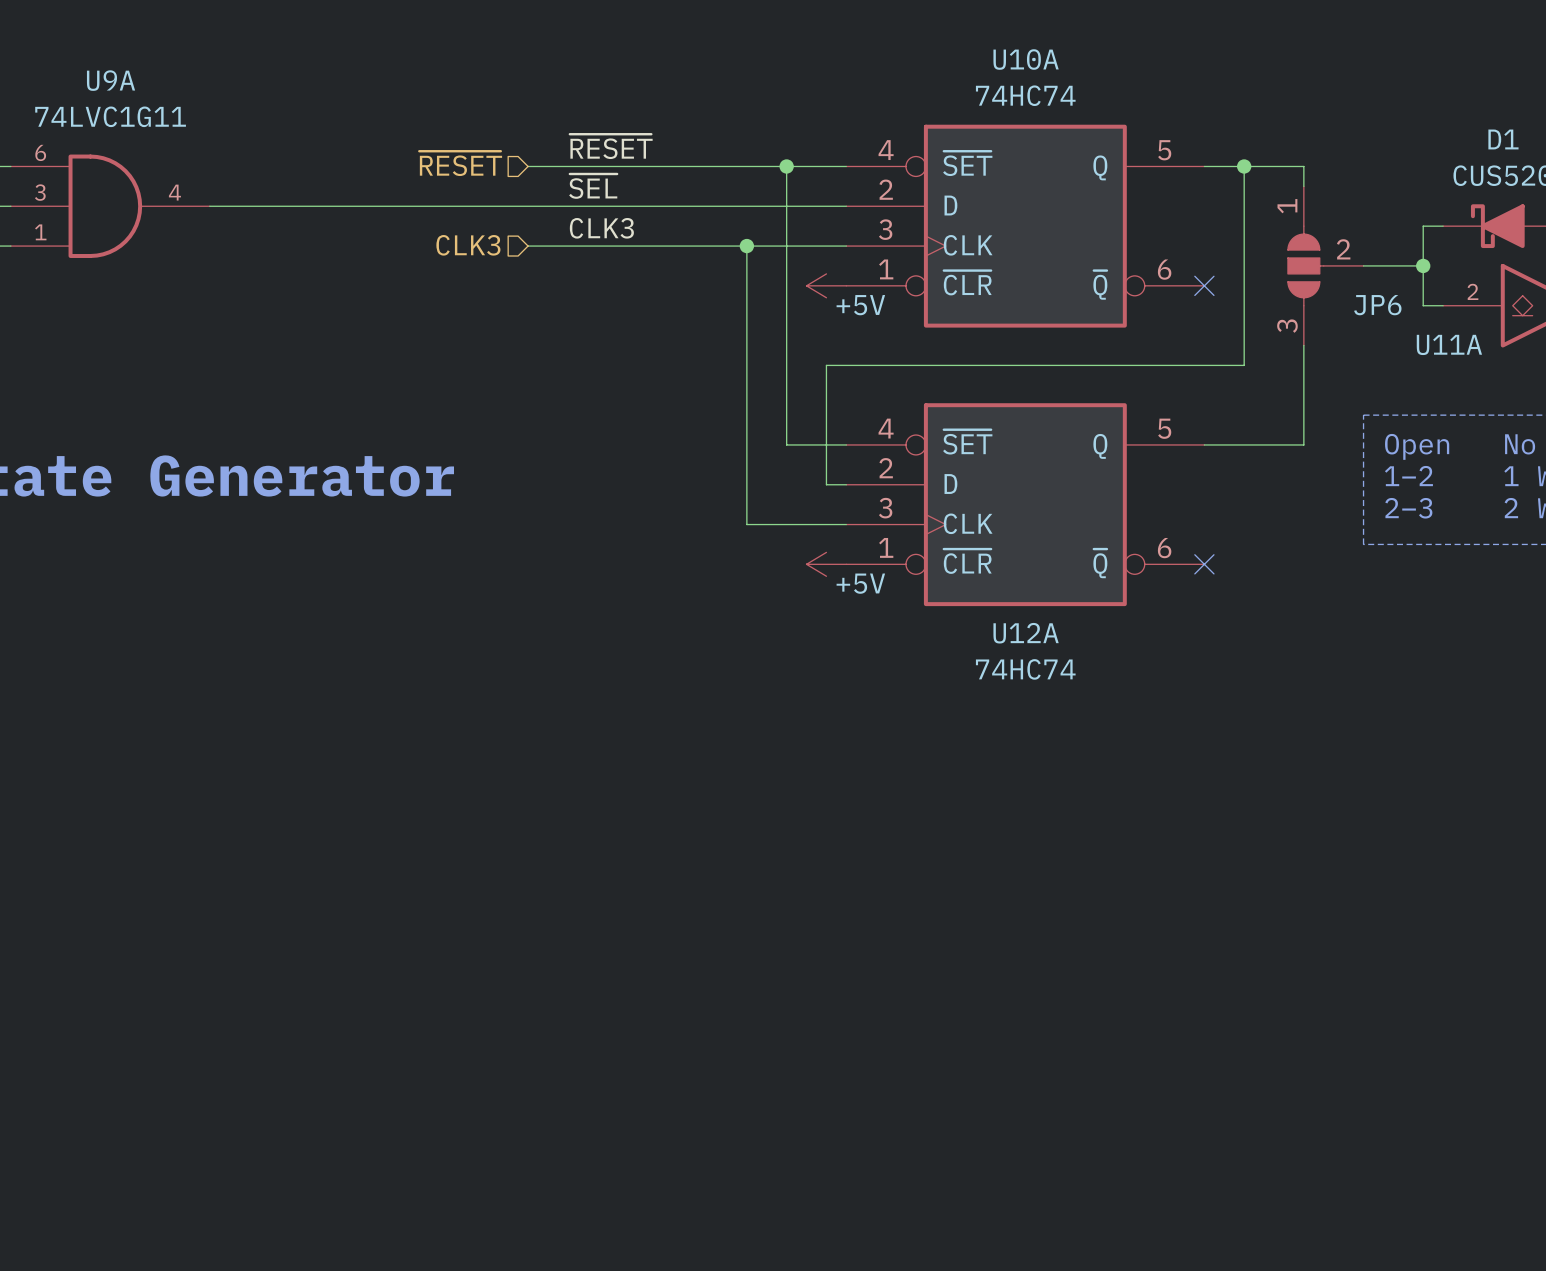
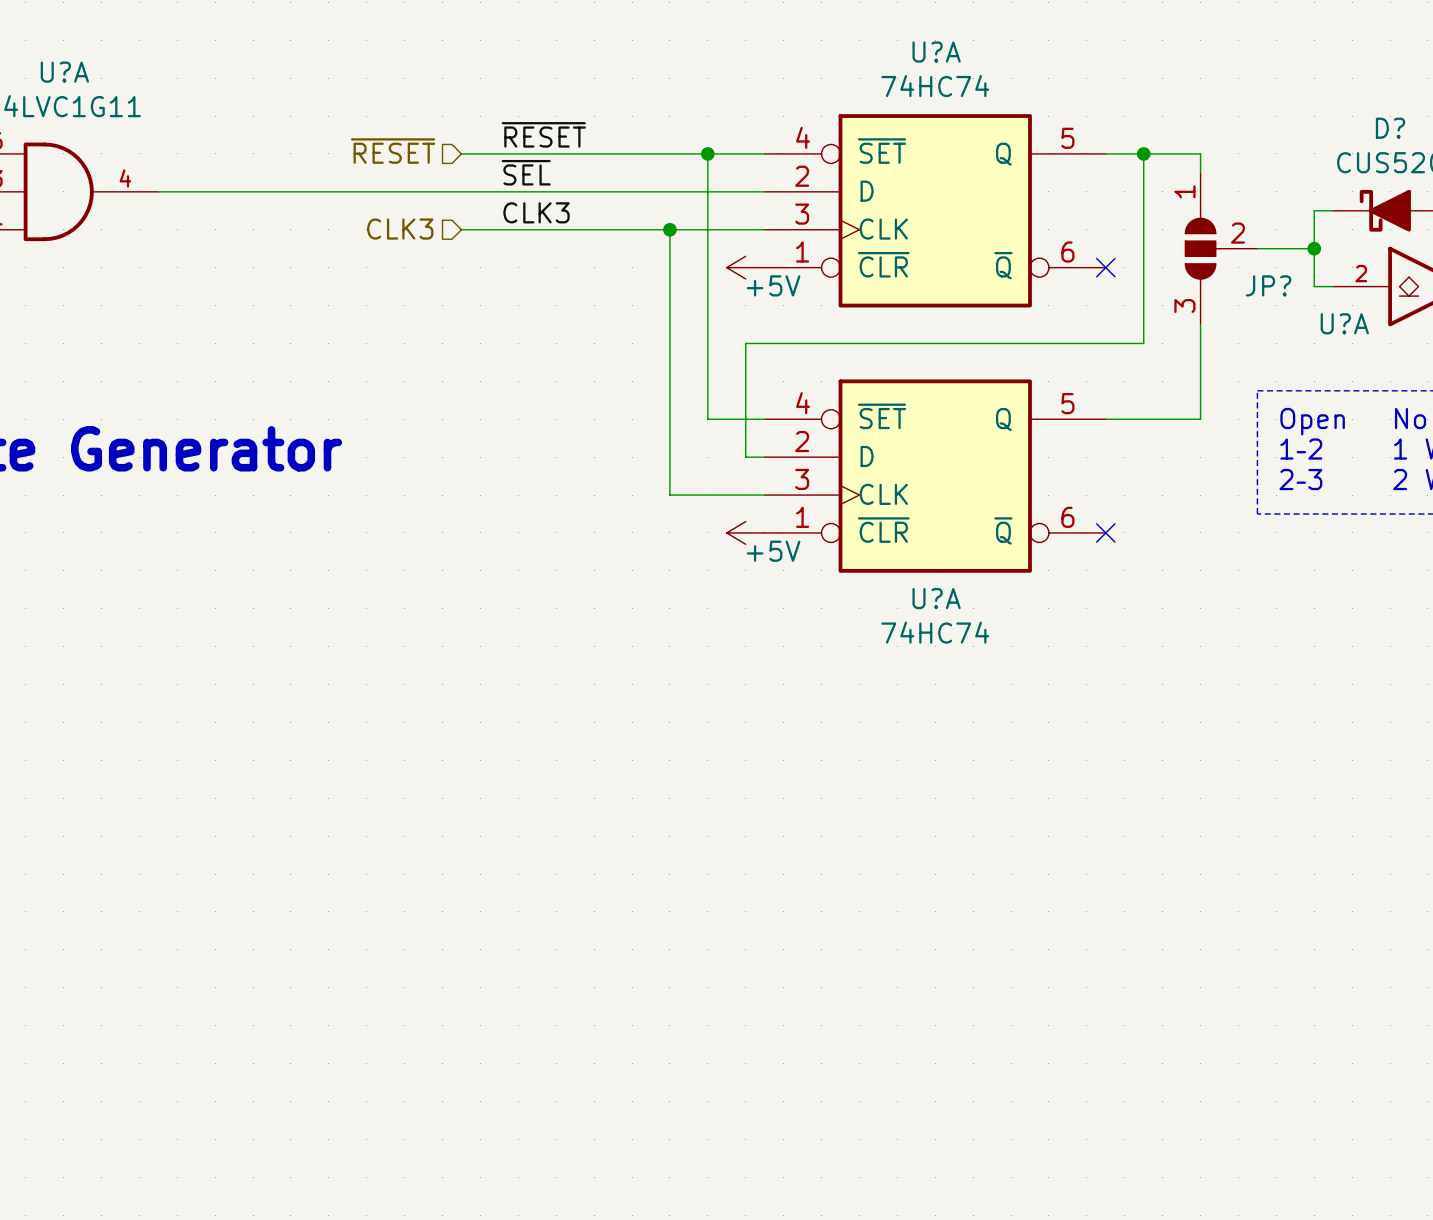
U10A name: U10A (1026, 59) -> U?A (936, 52)
U9A name: U9A (111, 80) -> U?A (64, 72)
D1 name: D1 (1503, 139) -> D? (1390, 128)
JP6 name: JP6 (1377, 305) -> JP? (1268, 285)
U11A name: U11A (1449, 344) -> U?A (1344, 323)
U12A name: U12A (1026, 633) -> U?A (936, 598)

